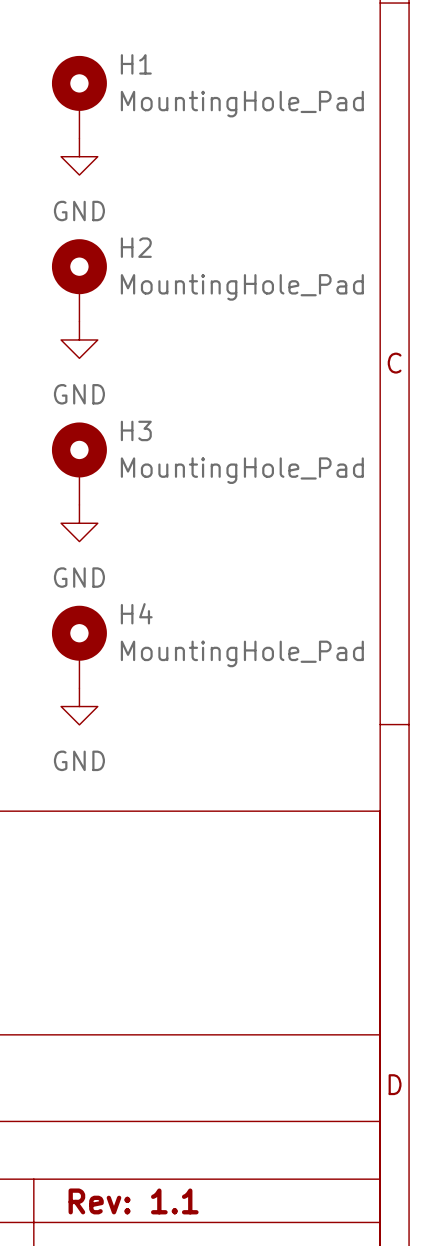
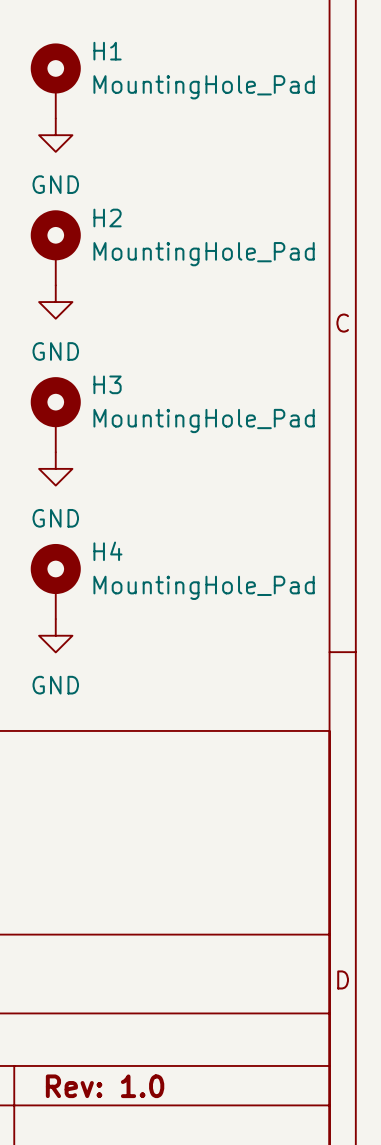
title block: Rev: 1.1 (133, 1201) -> Rev: 1.0 (105, 1086)

